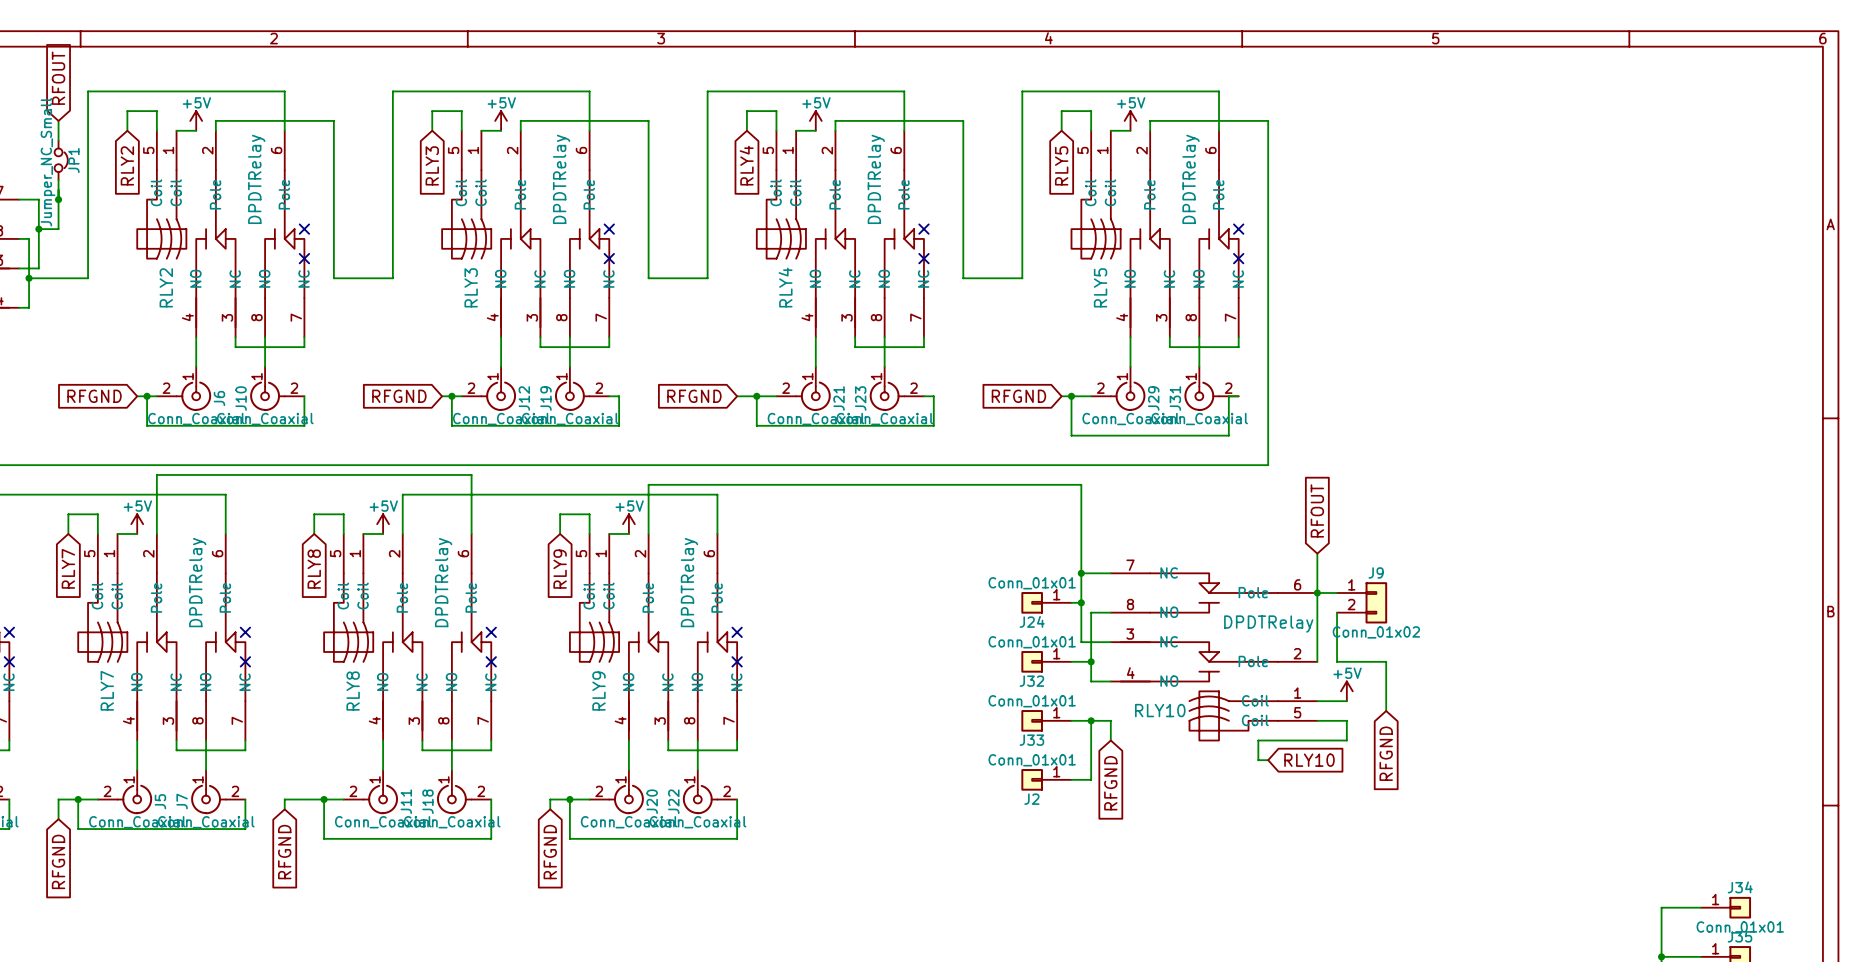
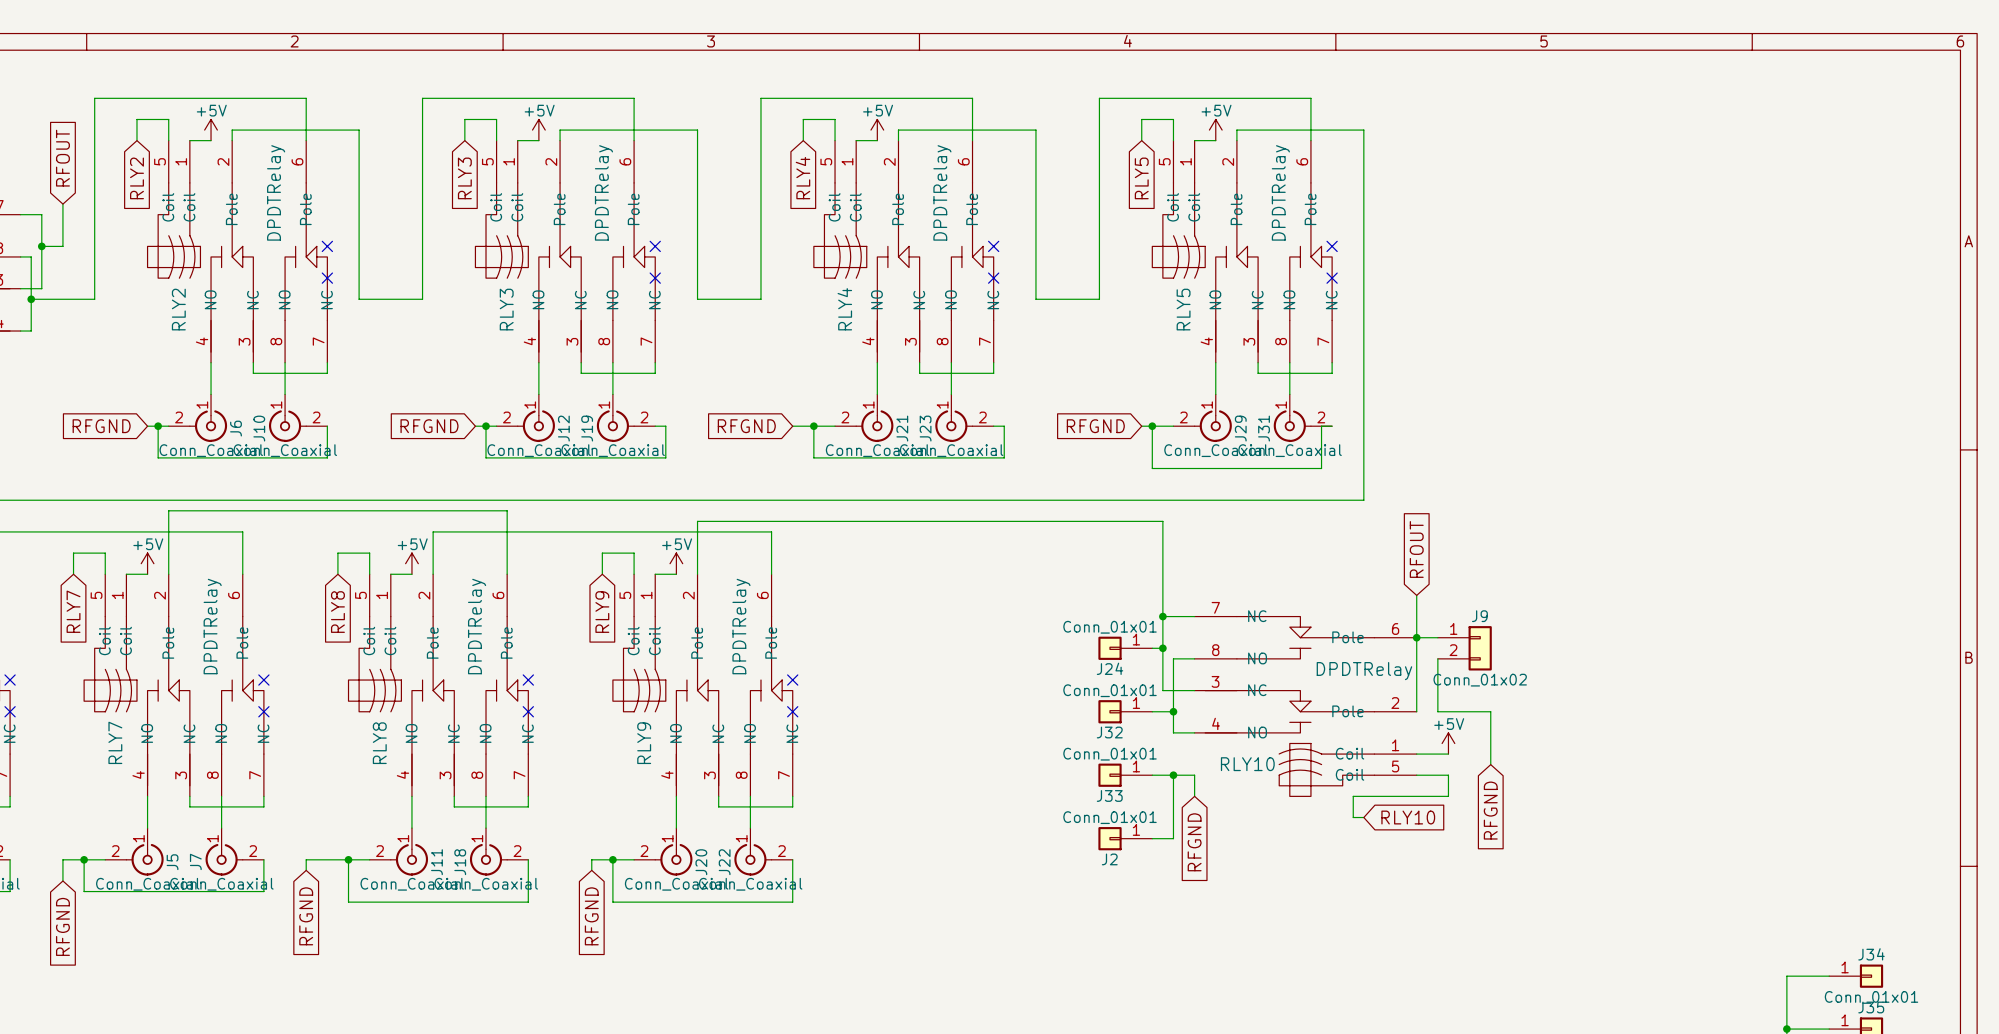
global label position: RFOUT (58, 78) -> RFOUT (62, 158)
wire: (58, 120) (58, 140) -> none
JP1: Jumper_NC_Small (61, 160) -> none
wire: (58, 179) (58, 189) -> none
junction: (58, 199) -> none

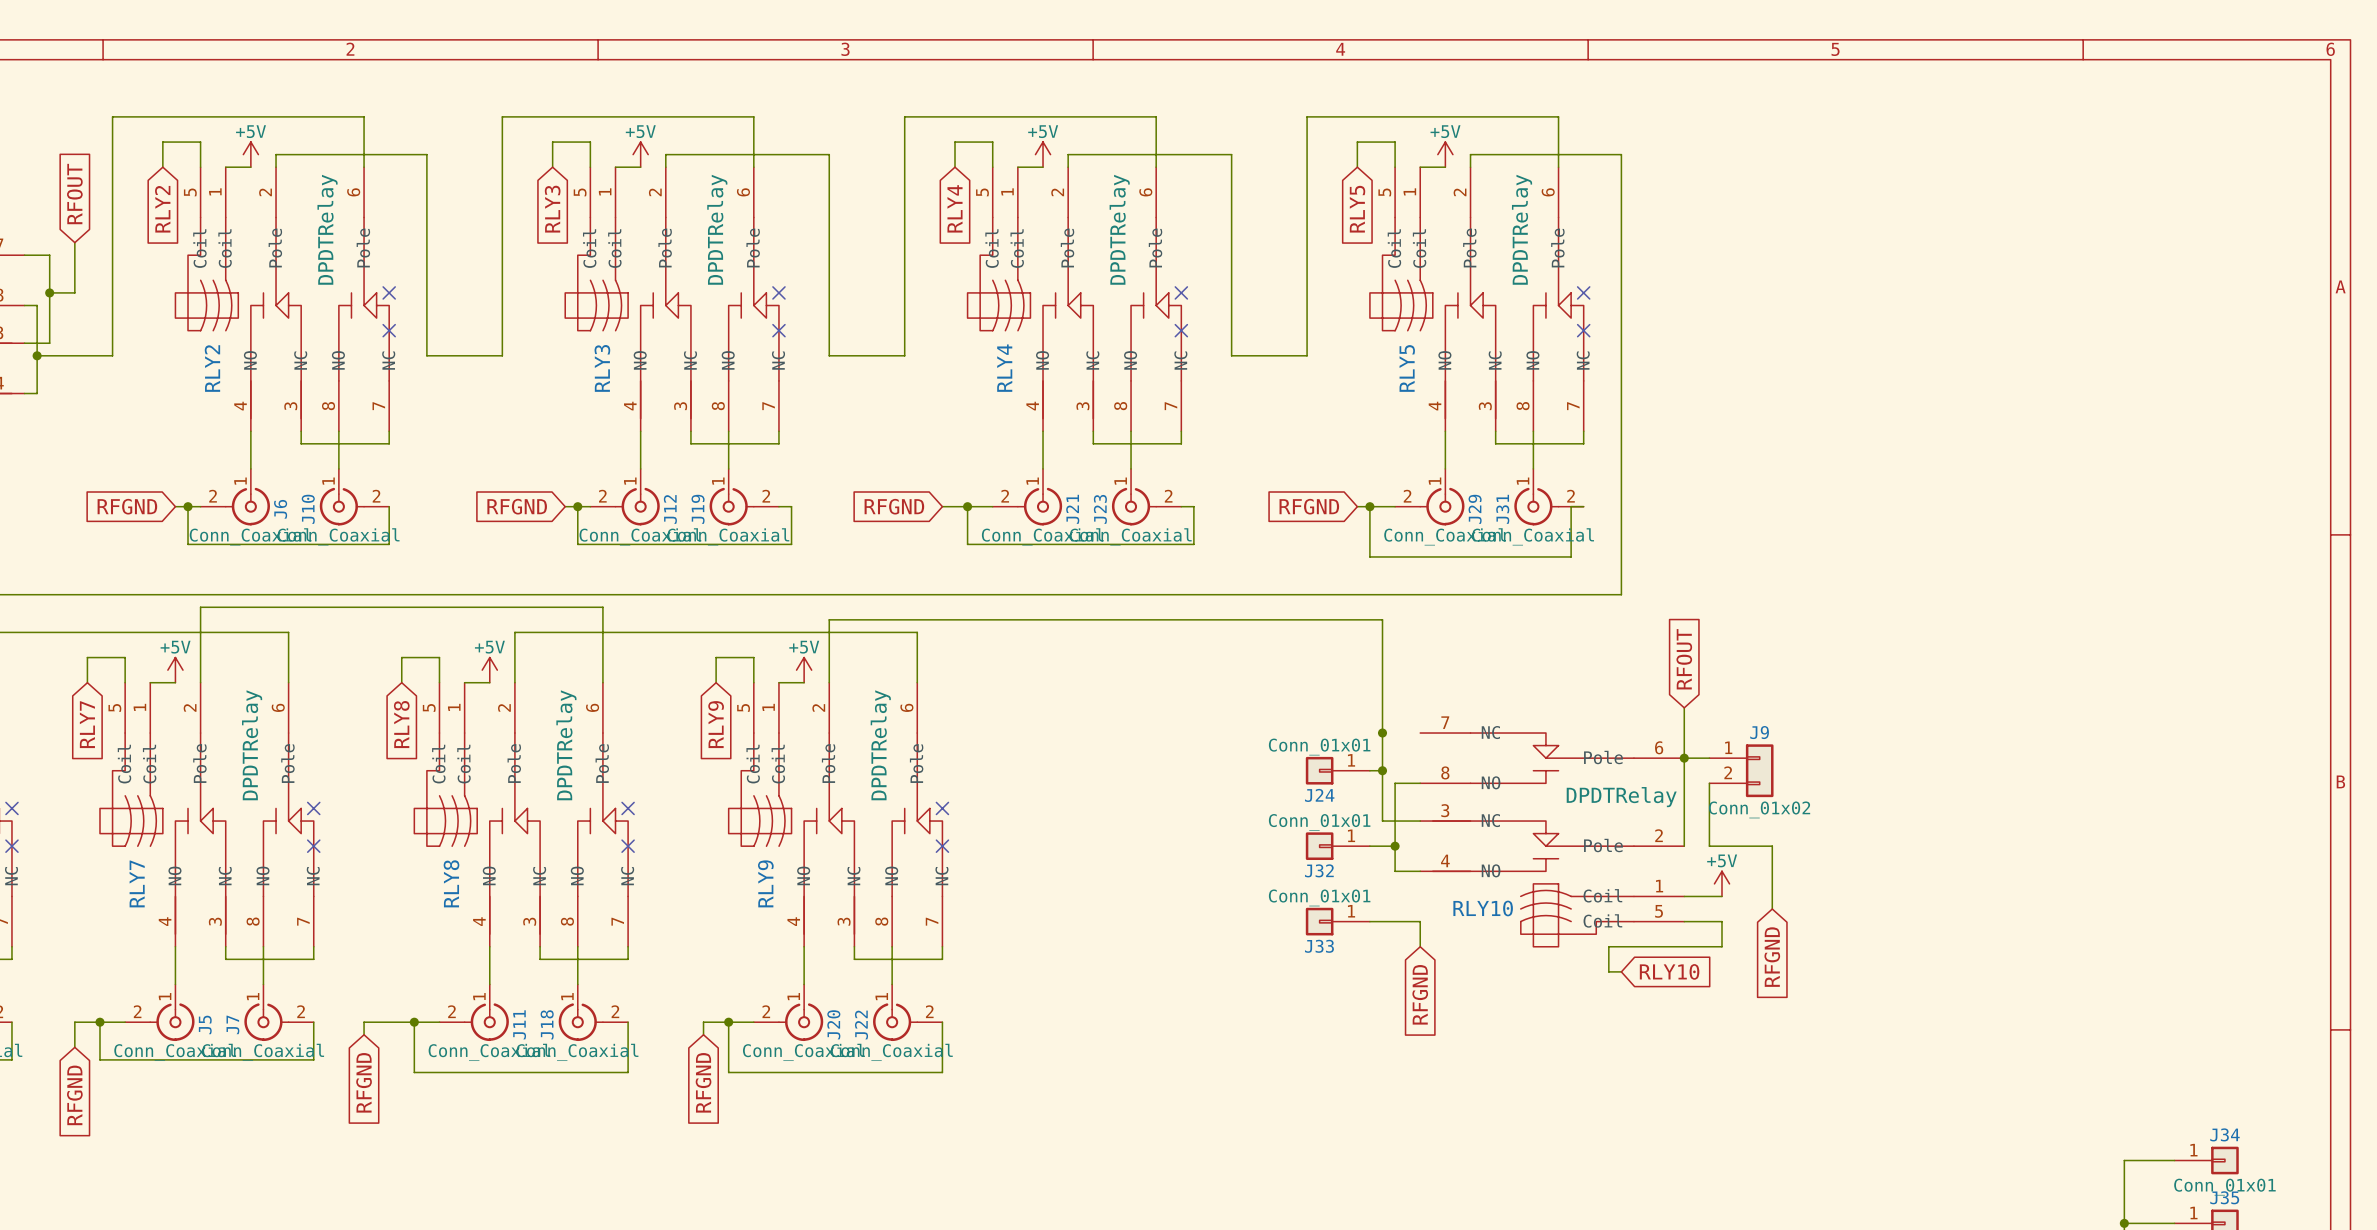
wire: (1162, 616) (1194, 616) -> none
wire: (1173, 775) (1173, 838) (1152, 838) -> none
junction: (1173, 775) -> none
J2: Conn_01x01 (1125, 838) -> none

